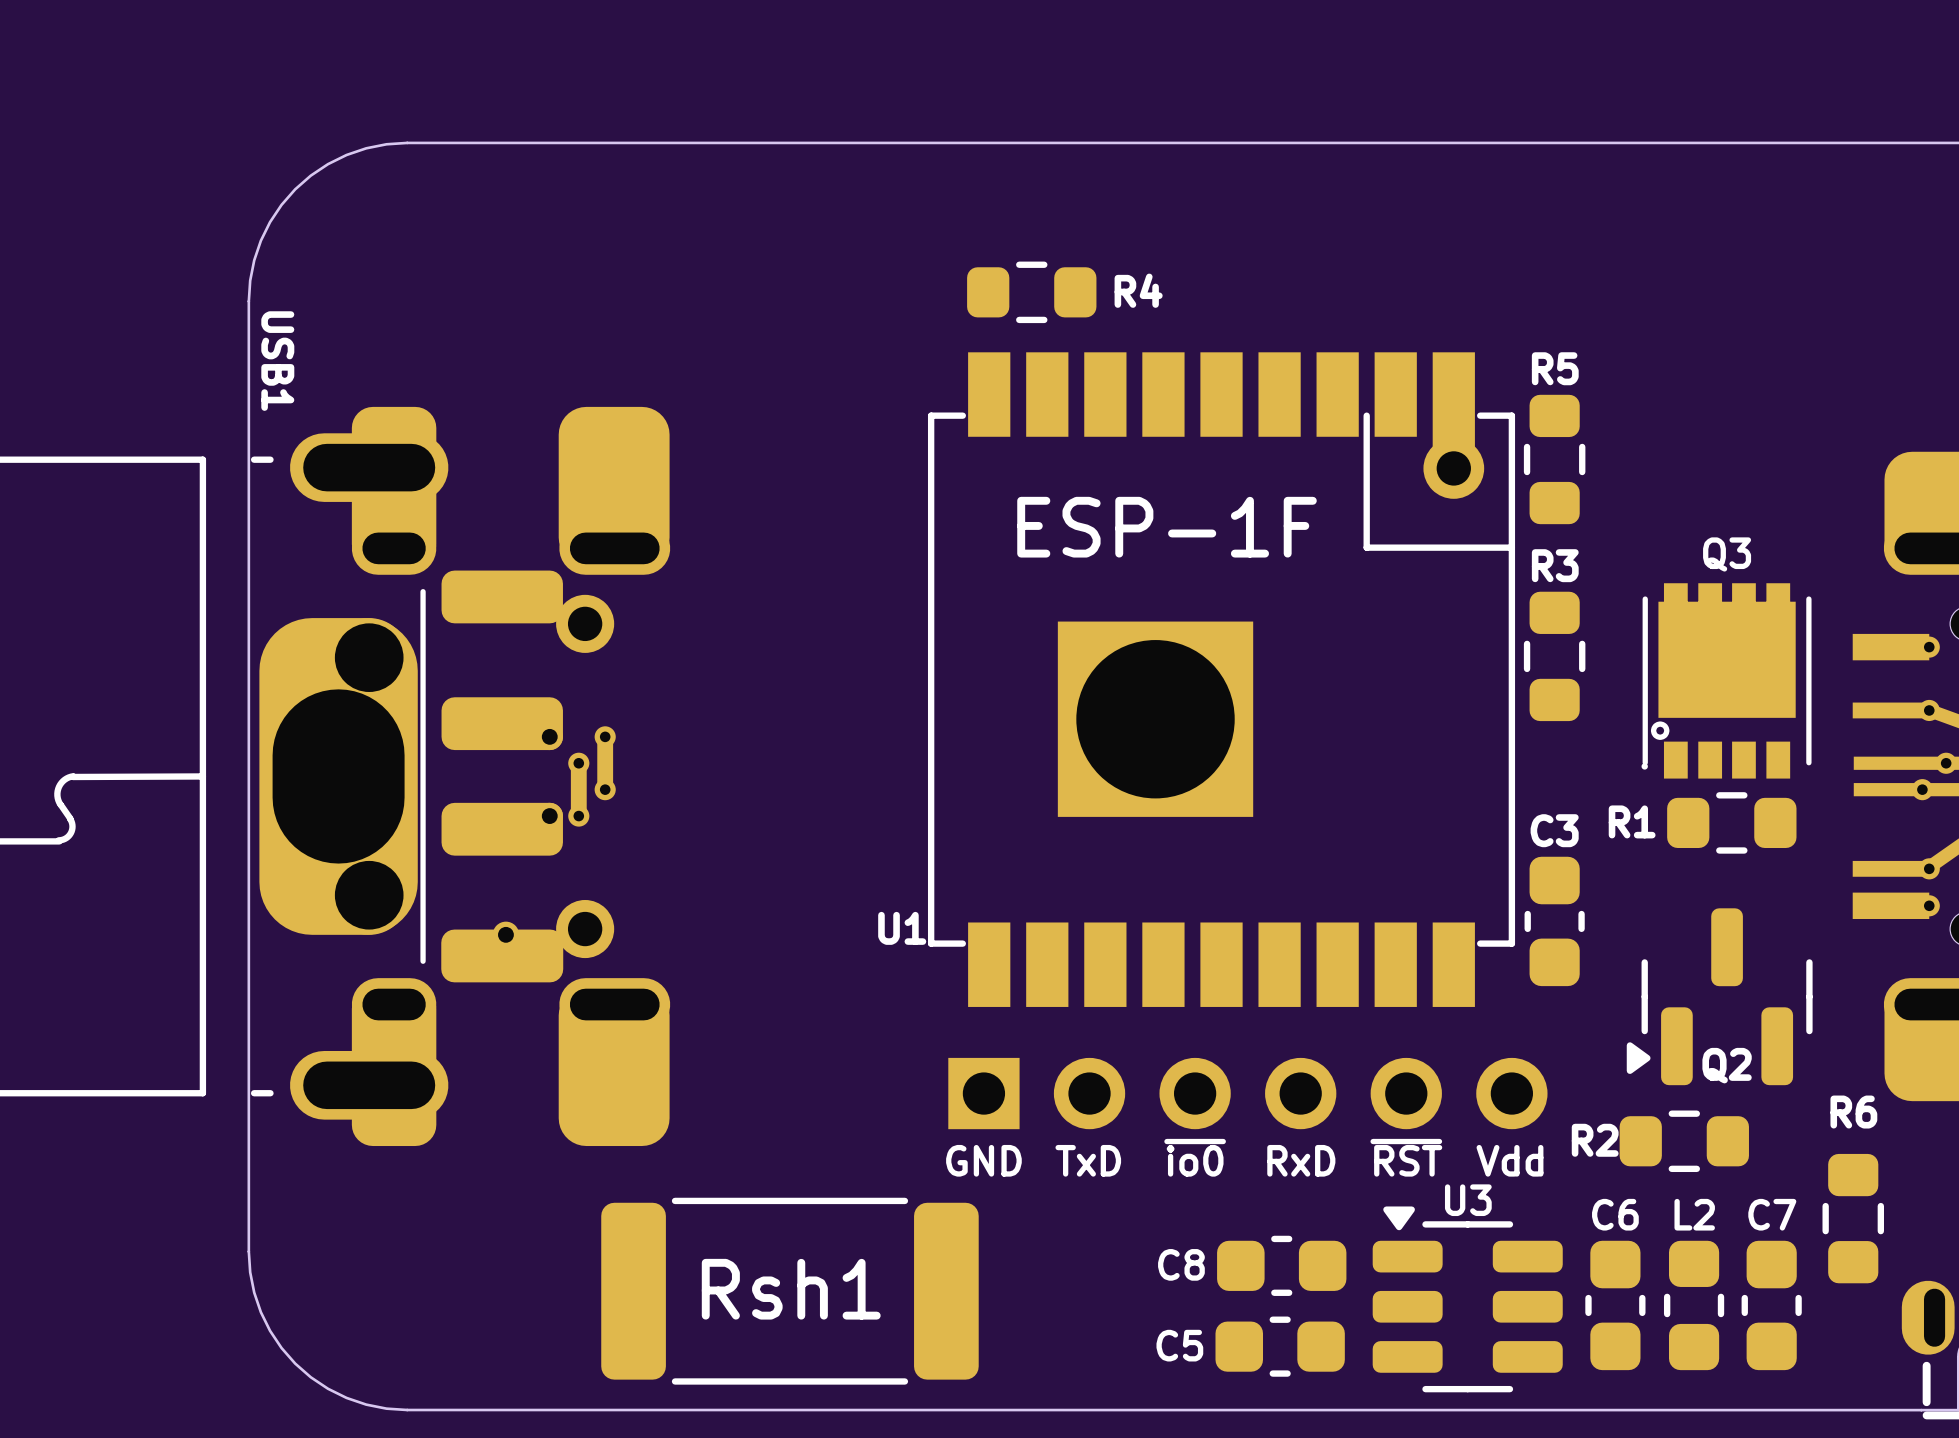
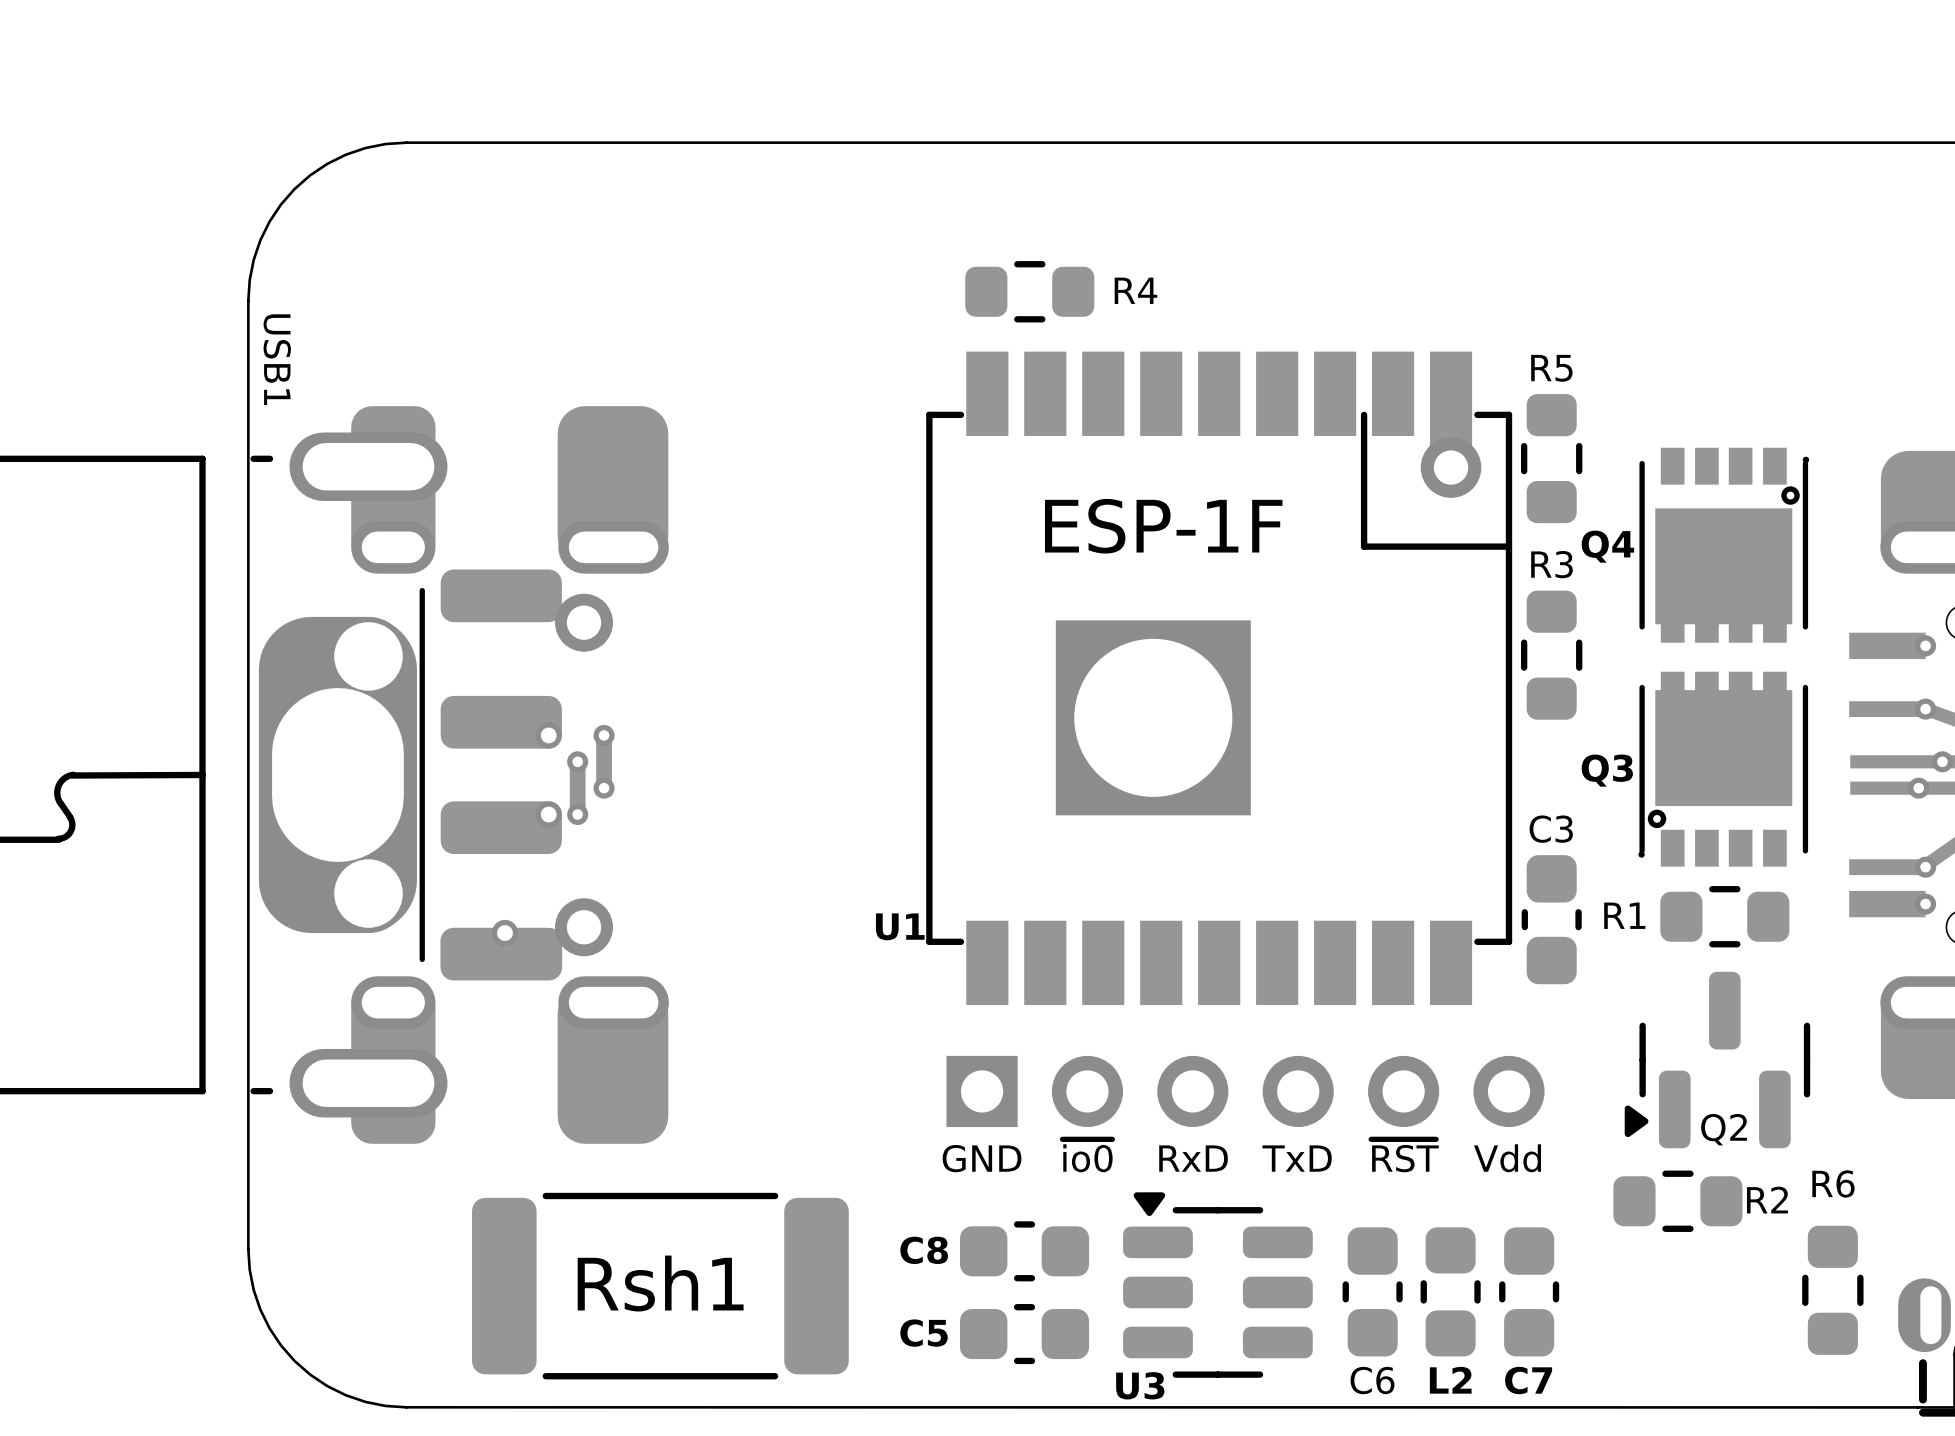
Q4: none -> (1724, 545)
Q3 name position: Q3 (1727, 554) -> Q3 (1607, 770)
Q3 position: (1726, 680) -> (1723, 769)
R1 position: (1731, 822) -> (1724, 916)
Q2 position: (1719, 996) -> (1717, 1060)
R2 name position: R2 (1595, 1140) -> R2 (1767, 1200)
R2 position: (1684, 1141) -> (1677, 1201)
text: ~{io0} (1195, 1157) -> RxD (1193, 1158)
text: TxD (1088, 1160) -> ~{io0} (1087, 1155)
text: RxD (1301, 1160) -> TxD (1297, 1158)
U3 name position: U3 (1468, 1200) -> U3 (1140, 1385)
C6 name position: C6 (1615, 1214) -> C6 (1372, 1380)
L2 name position: L2 (1694, 1214) -> L2 (1450, 1380)
C7 name position: C7 (1772, 1214) -> C7 (1528, 1380)
R6 position: (1853, 1218) -> (1832, 1290)
C8 position: (1281, 1265) -> (1024, 1251)
Rsh1 position: (789, 1291) -> (660, 1286)
U3 position: (1467, 1299) -> (1217, 1285)
C6 position: (1615, 1305) -> (1372, 1291)
L2 position: (1694, 1305) -> (1450, 1291)
C7 position: (1771, 1305) -> (1529, 1291)
C5 position: (1280, 1346) -> (1024, 1334)

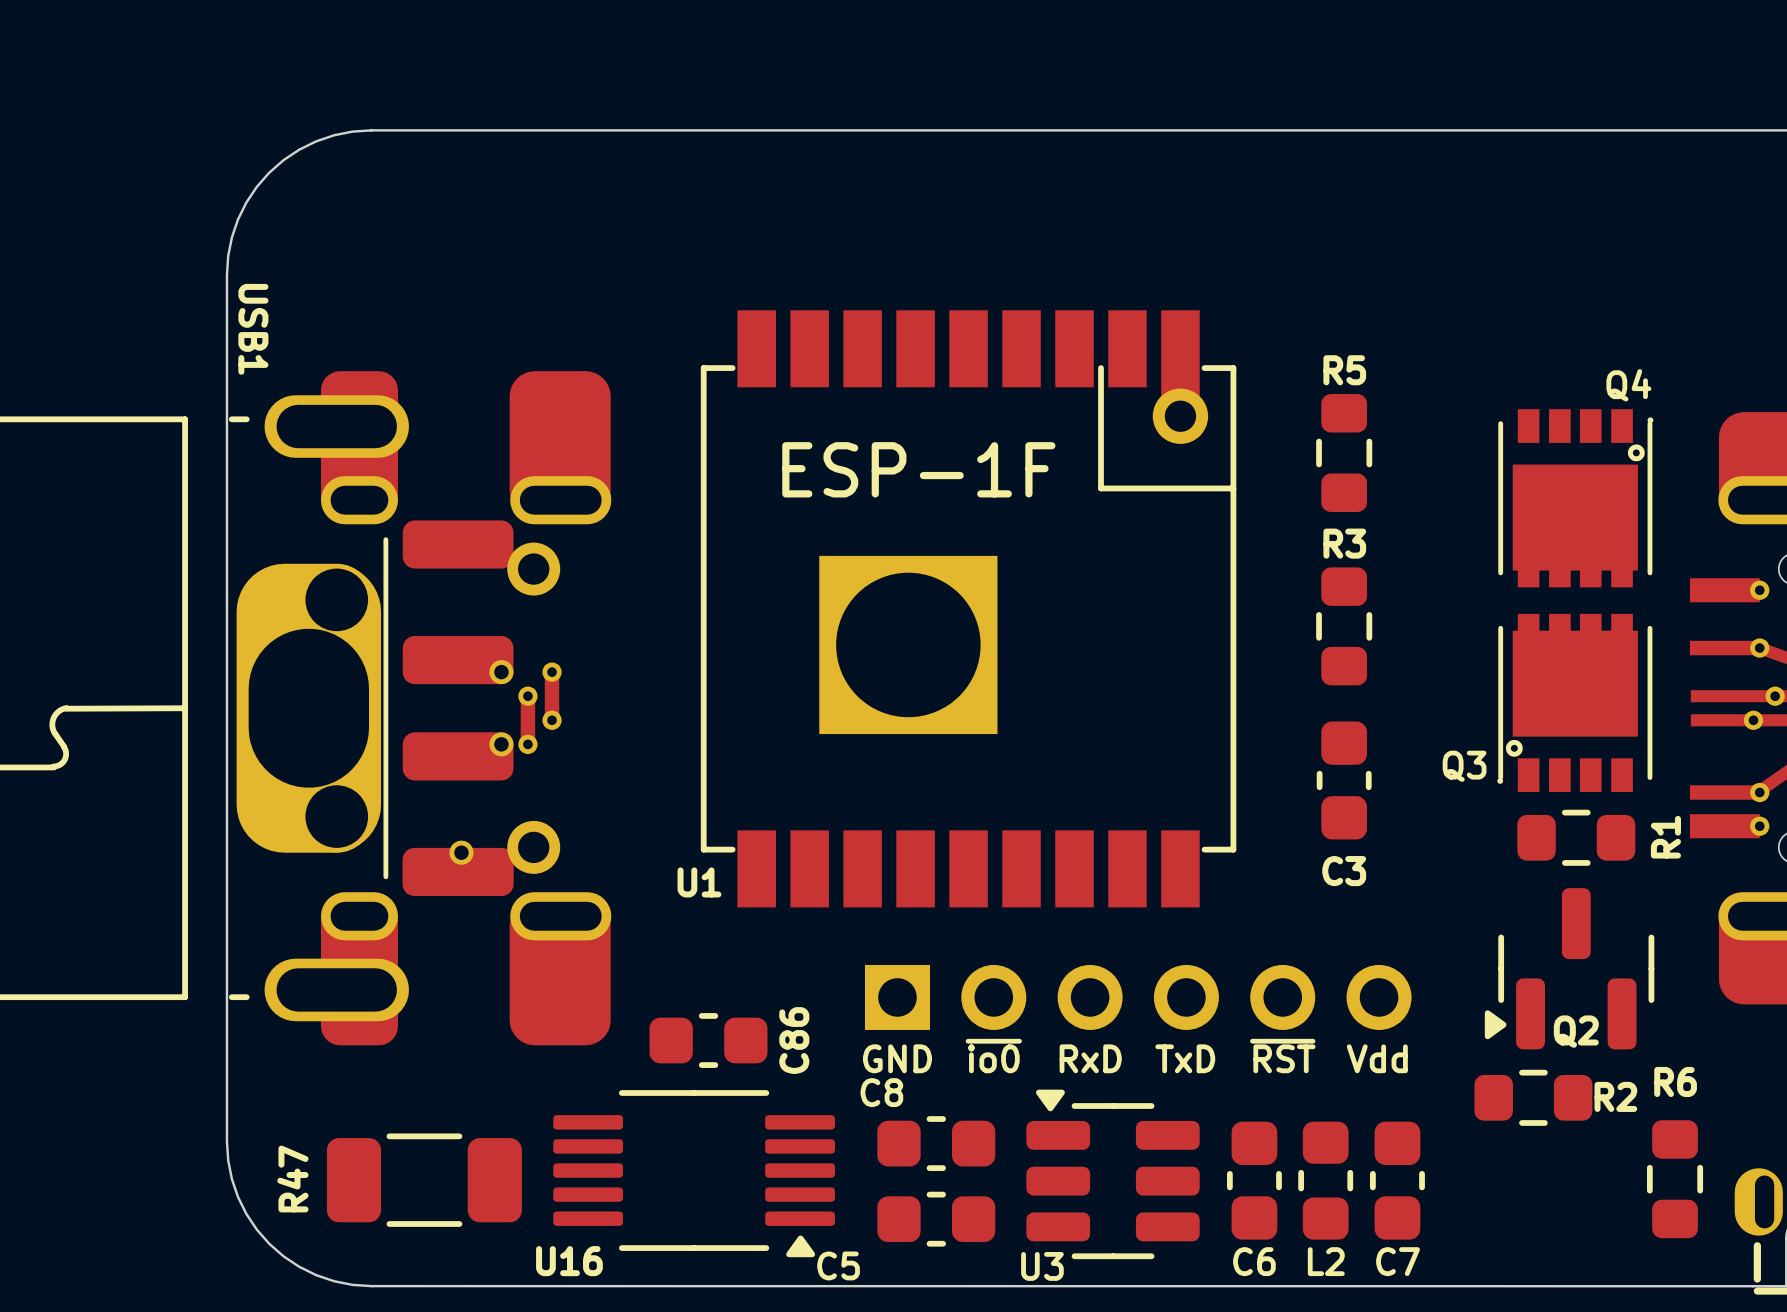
R4: (1029, 291) -> none
R5 position: (1551, 458) -> (1344, 453)
Q4 name position: Q4 (1607, 546) -> Q4 (1628, 385)
R3 position: (1551, 655) -> (1344, 626)
U1 position: (1219, 678) -> (968, 608)
Q3 name position: Q3 (1607, 770) -> Q3 (1464, 766)
C3 name position: C3 (1551, 829) -> C3 (1344, 871)
R1 name rotation: 0° (1624, 915) -> 90° counterclockwise (1665, 837)
R1 name position: R1 (1624, 915) -> R1 (1665, 837)
C3 position: (1551, 919) -> (1344, 780)
U1 name position: U1 (900, 926) -> U1 (699, 882)
C86: none -> (708, 1040)
C8 name position: C8 (924, 1250) -> C8 (881, 1092)
U16: none -> (694, 1173)
Rsh1: (660, 1286) -> none
R47: none -> (424, 1180)
C5 name position: C5 (924, 1333) -> C5 (838, 1265)

